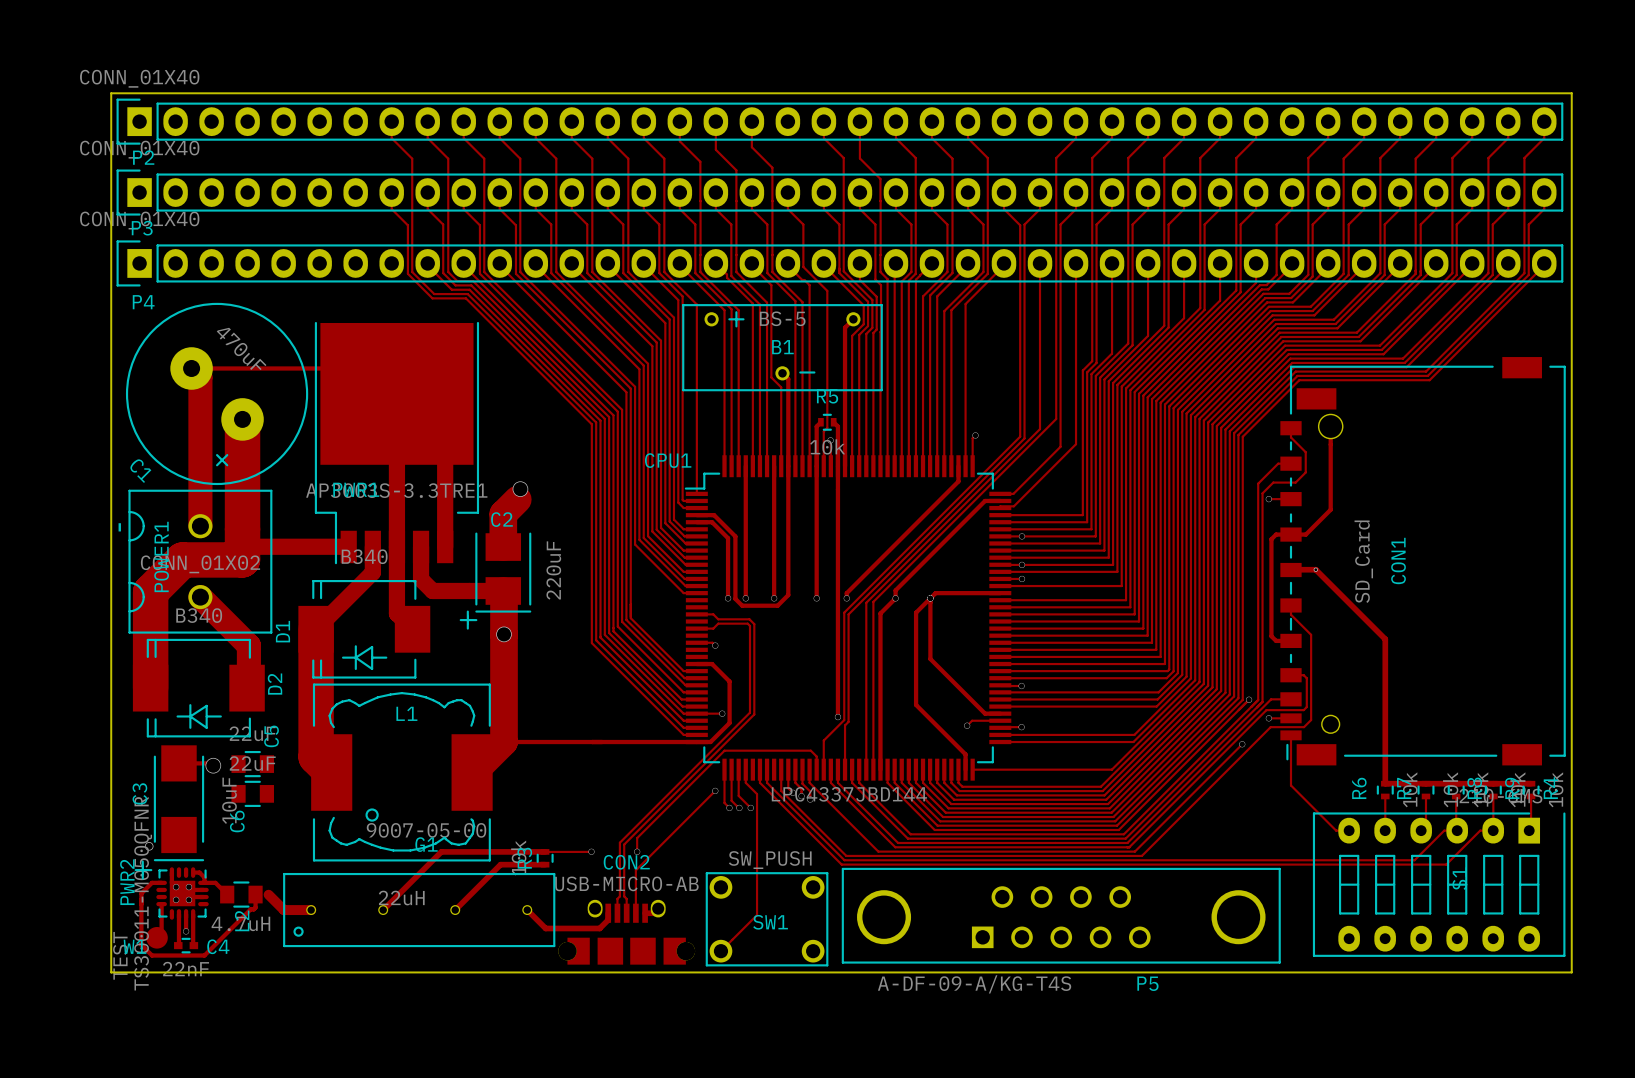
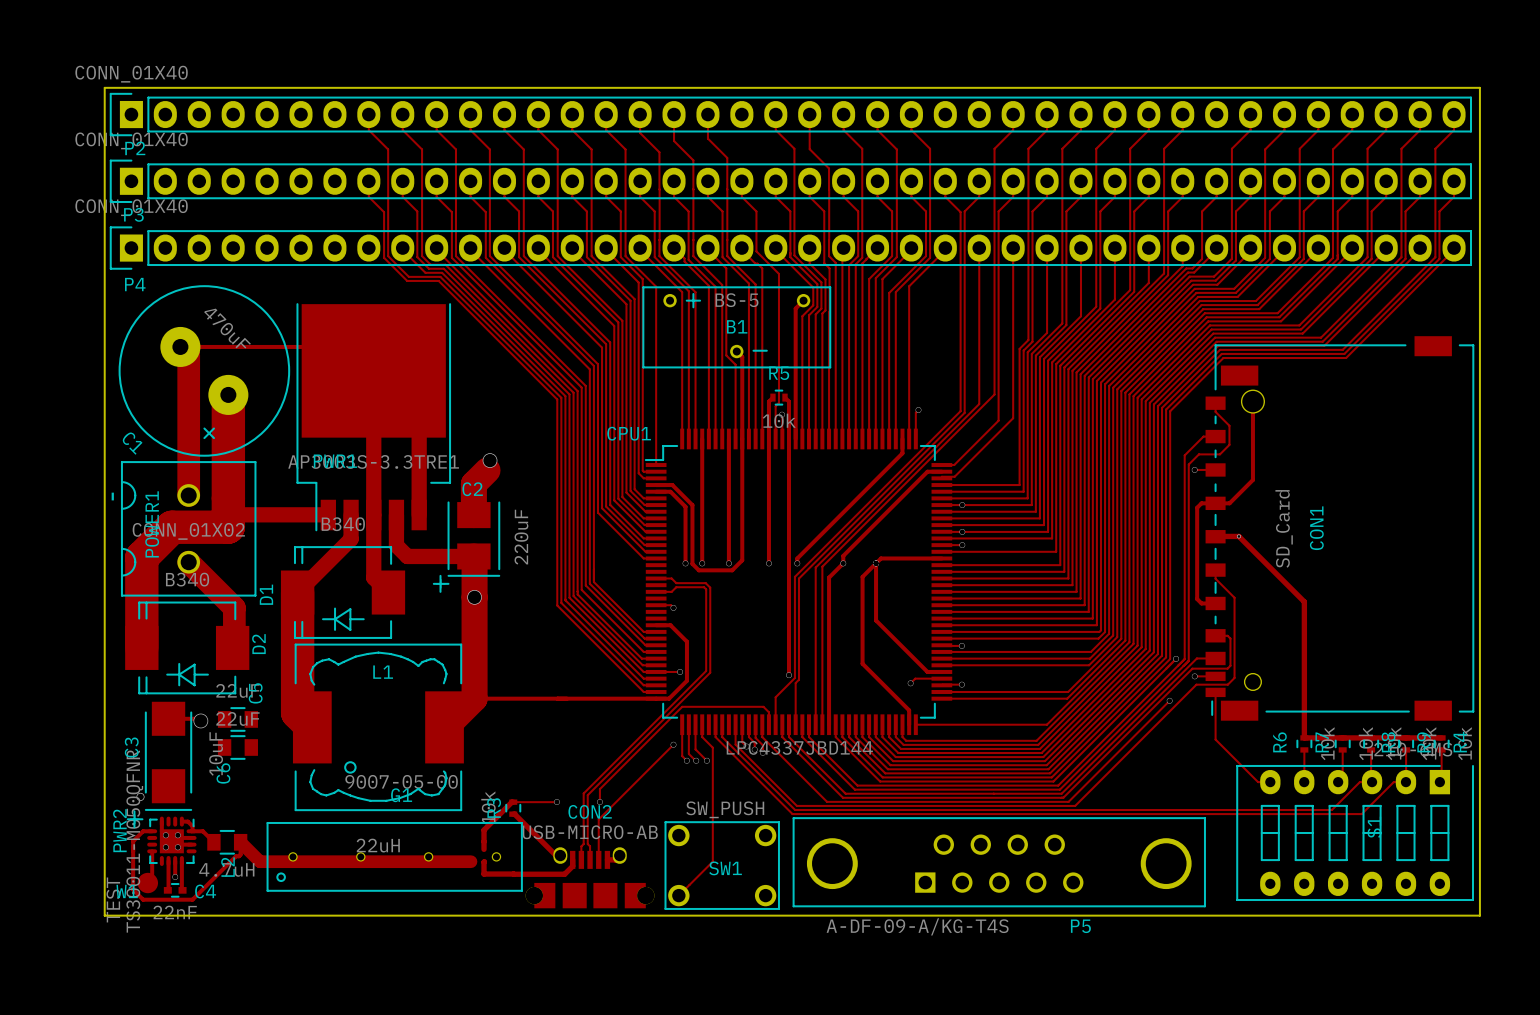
track: (543, 851) (441, 851) (383, 910) -> (511, 802) (484, 830) (484, 849)
track: (545, 864) (500, 864) (455, 910) -> (513, 814) (556, 855) (560, 855)
track: none -> (240, 842) (260, 861) (470, 861)
track: (268, 894) (283, 910) (311, 910) -> none
track: (527, 910) (545, 928) -> (484, 861) (484, 874) (513, 874)

